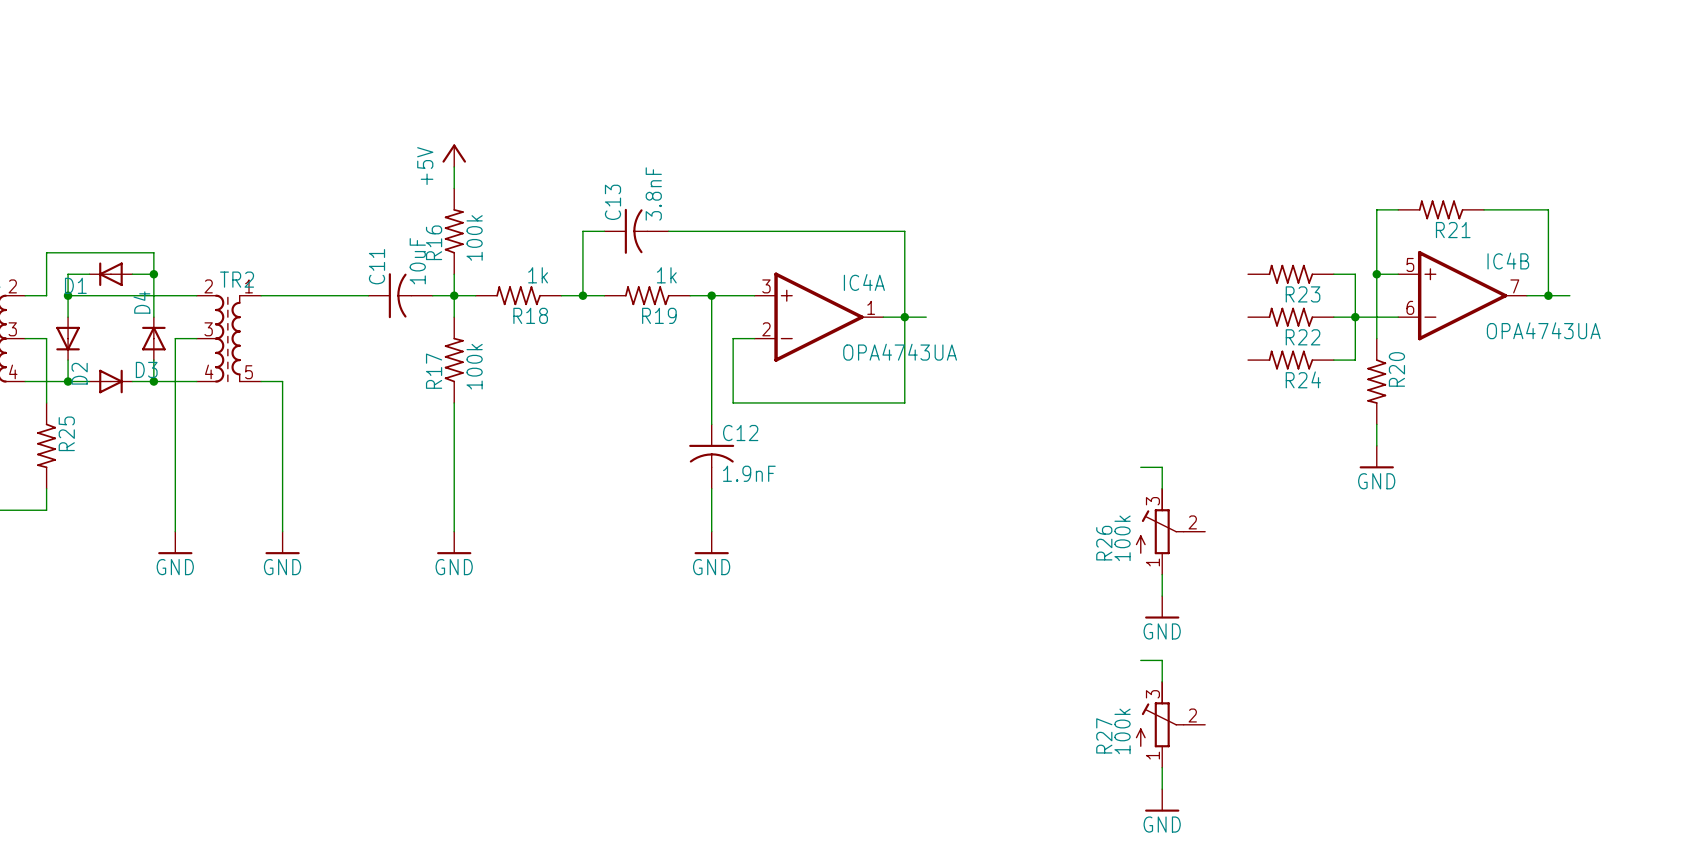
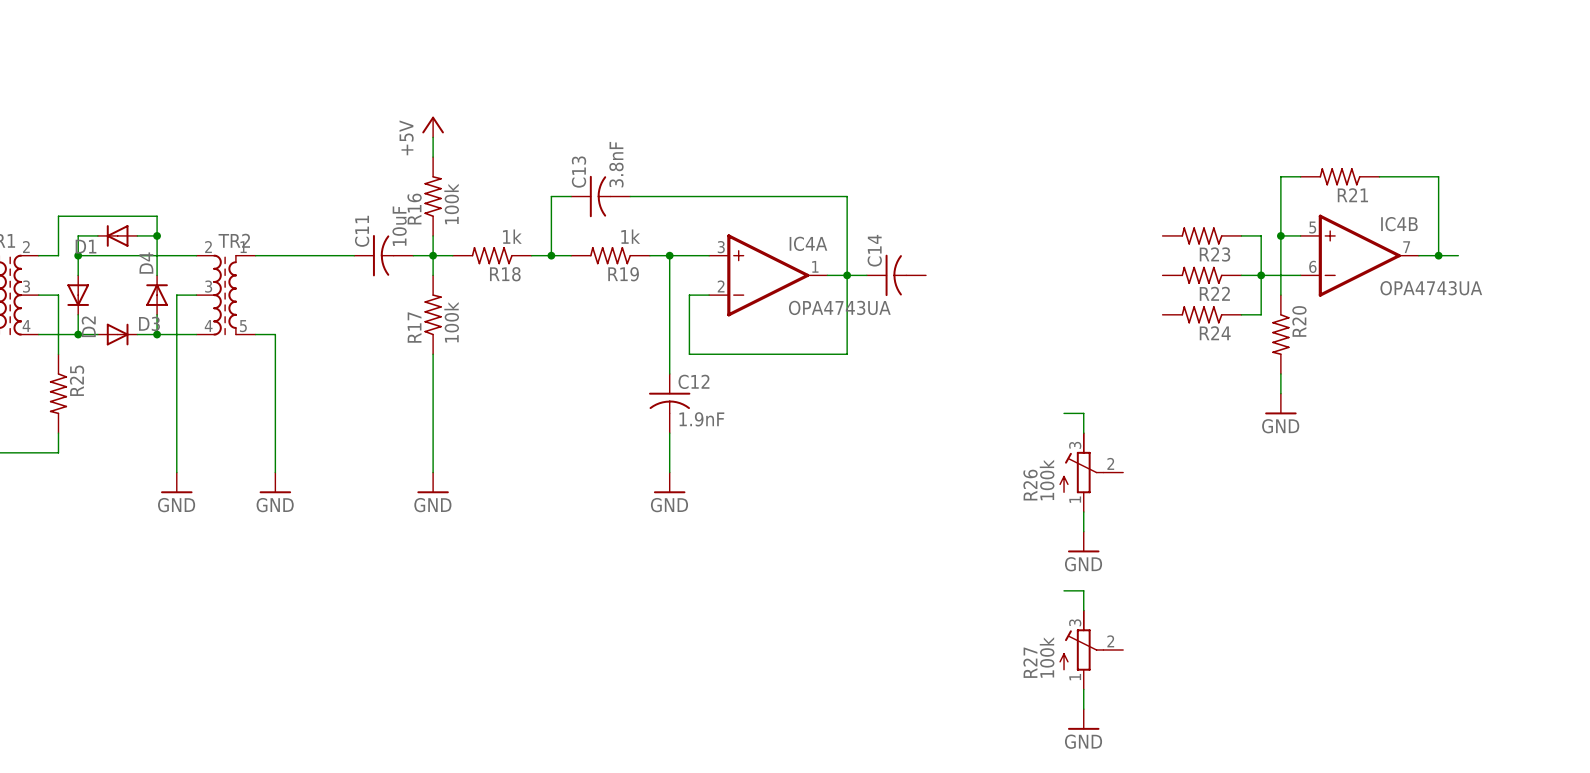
C14: none -> (896, 275)

